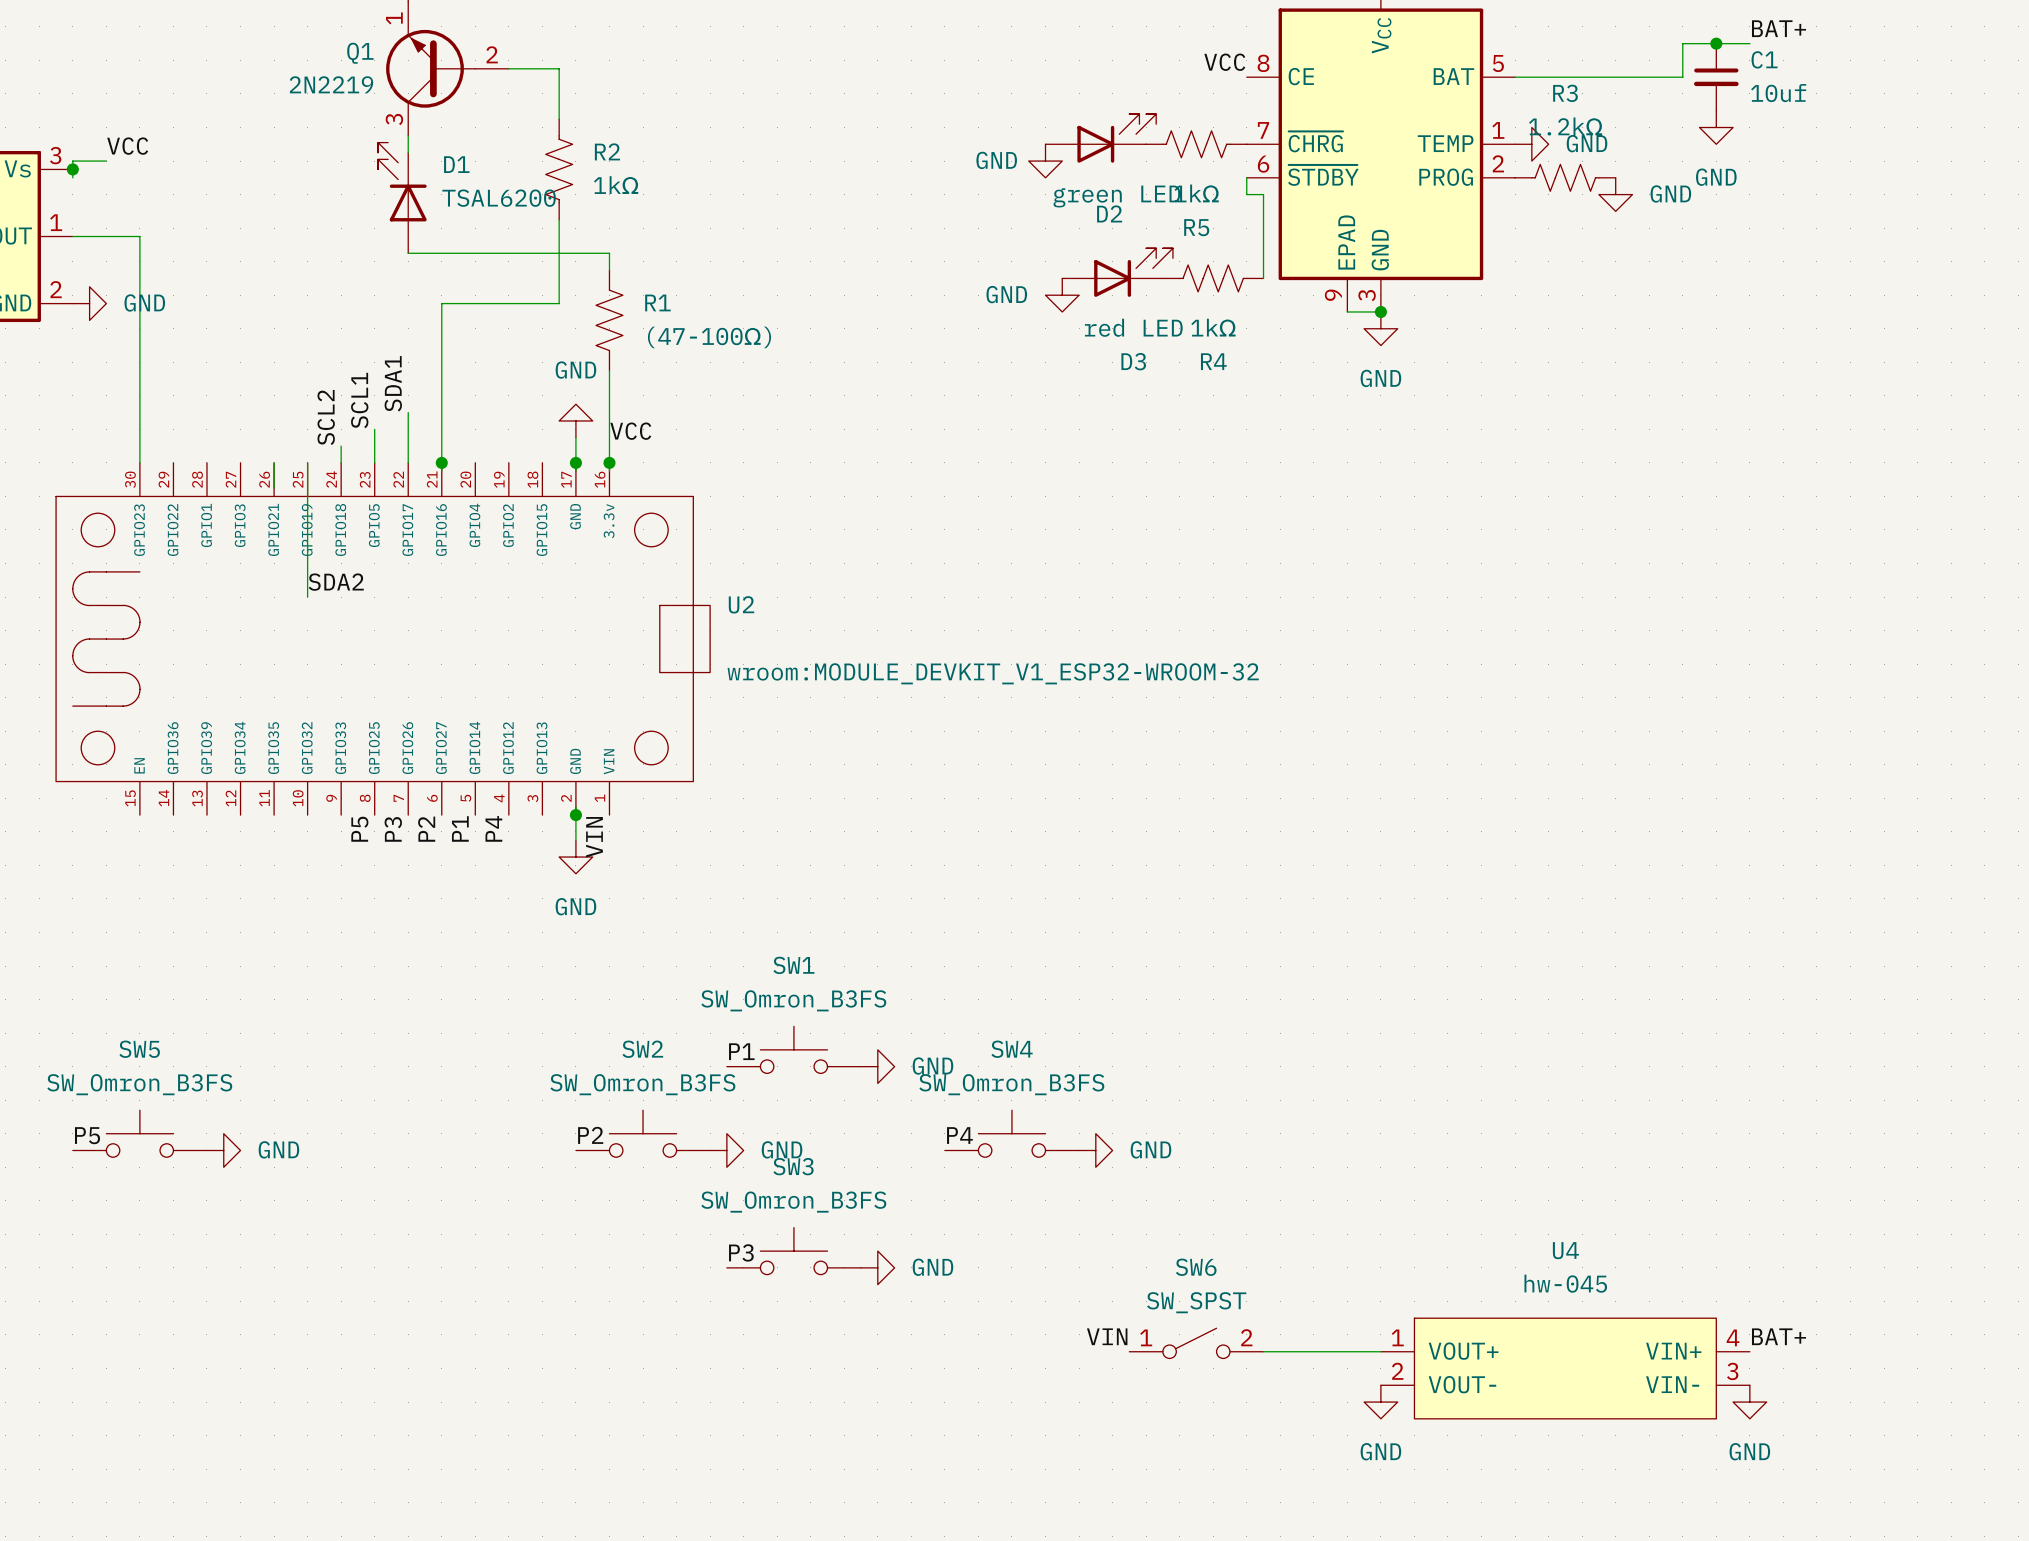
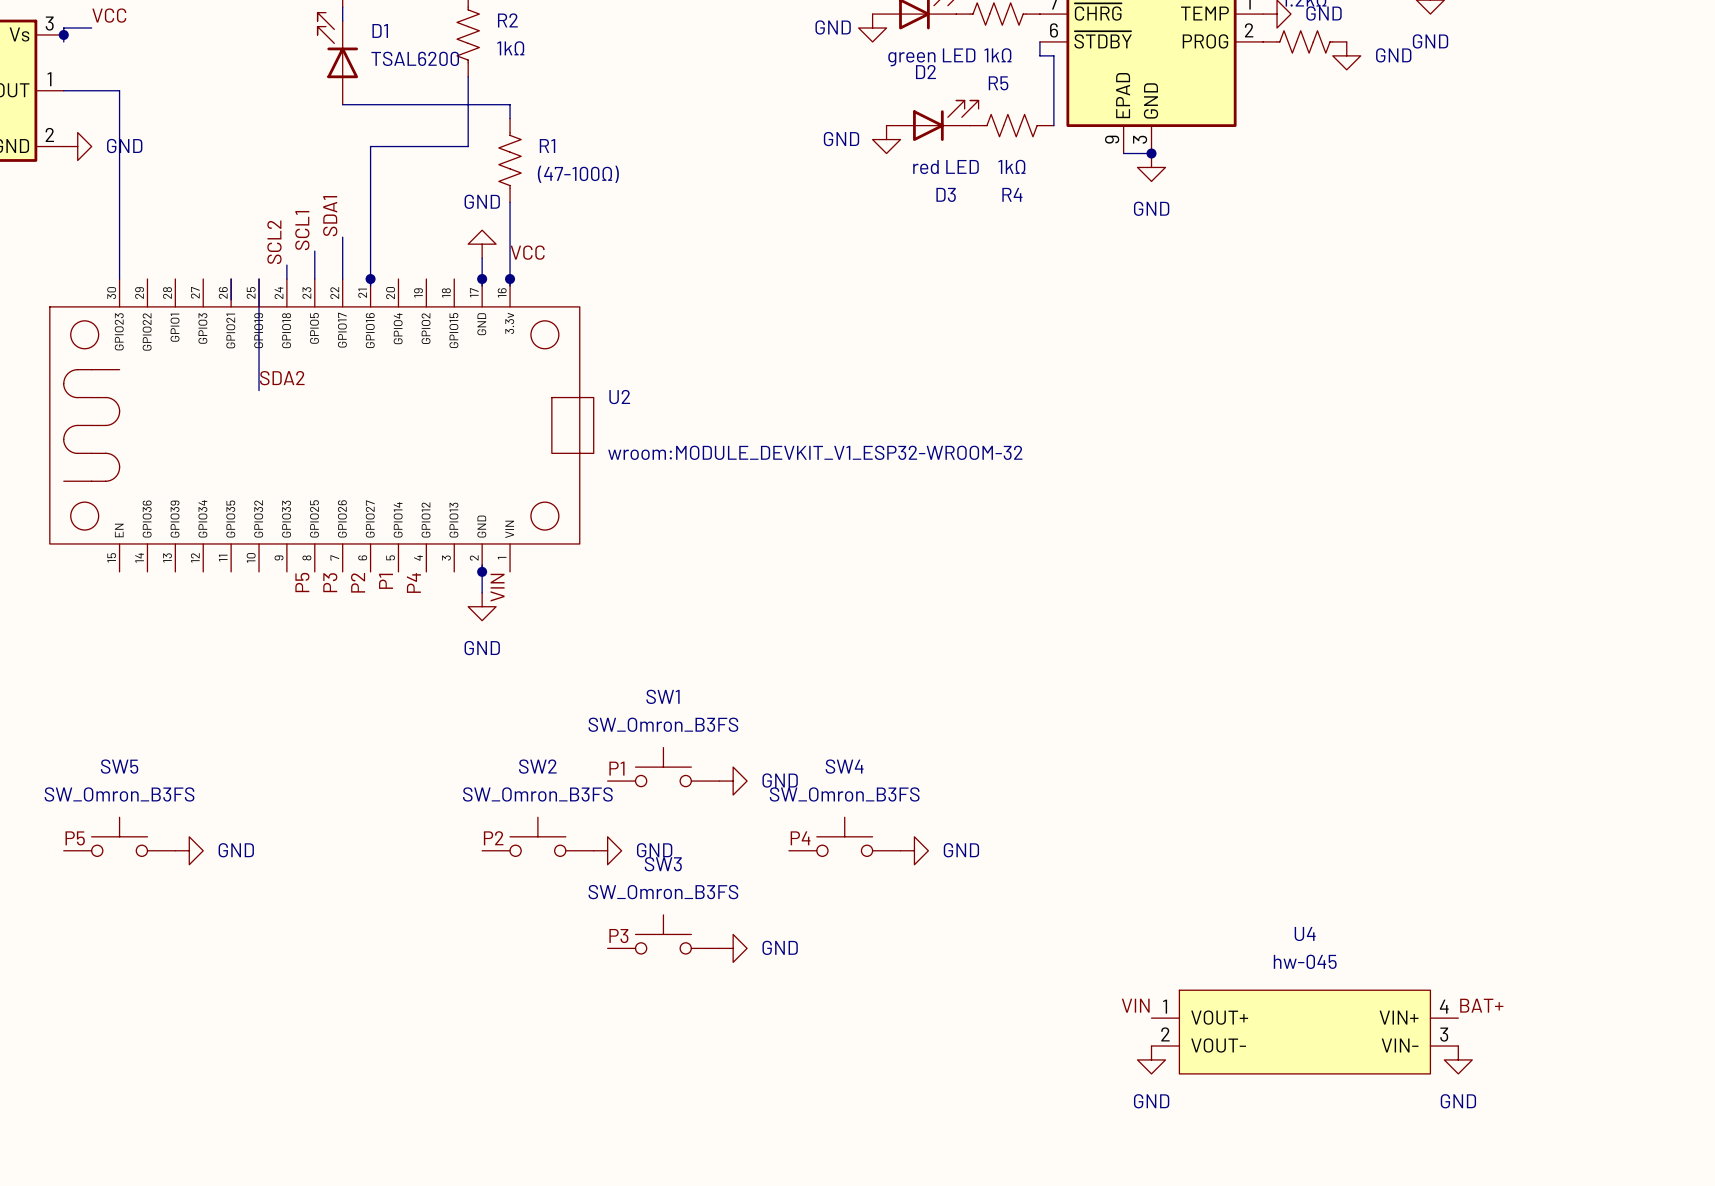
label position: VIN (1107, 1336) -> VIN (1135, 1005)
SW6: SW_SPST (1196, 1343) -> none
wire: (1263, 1351) (1380, 1351) -> none

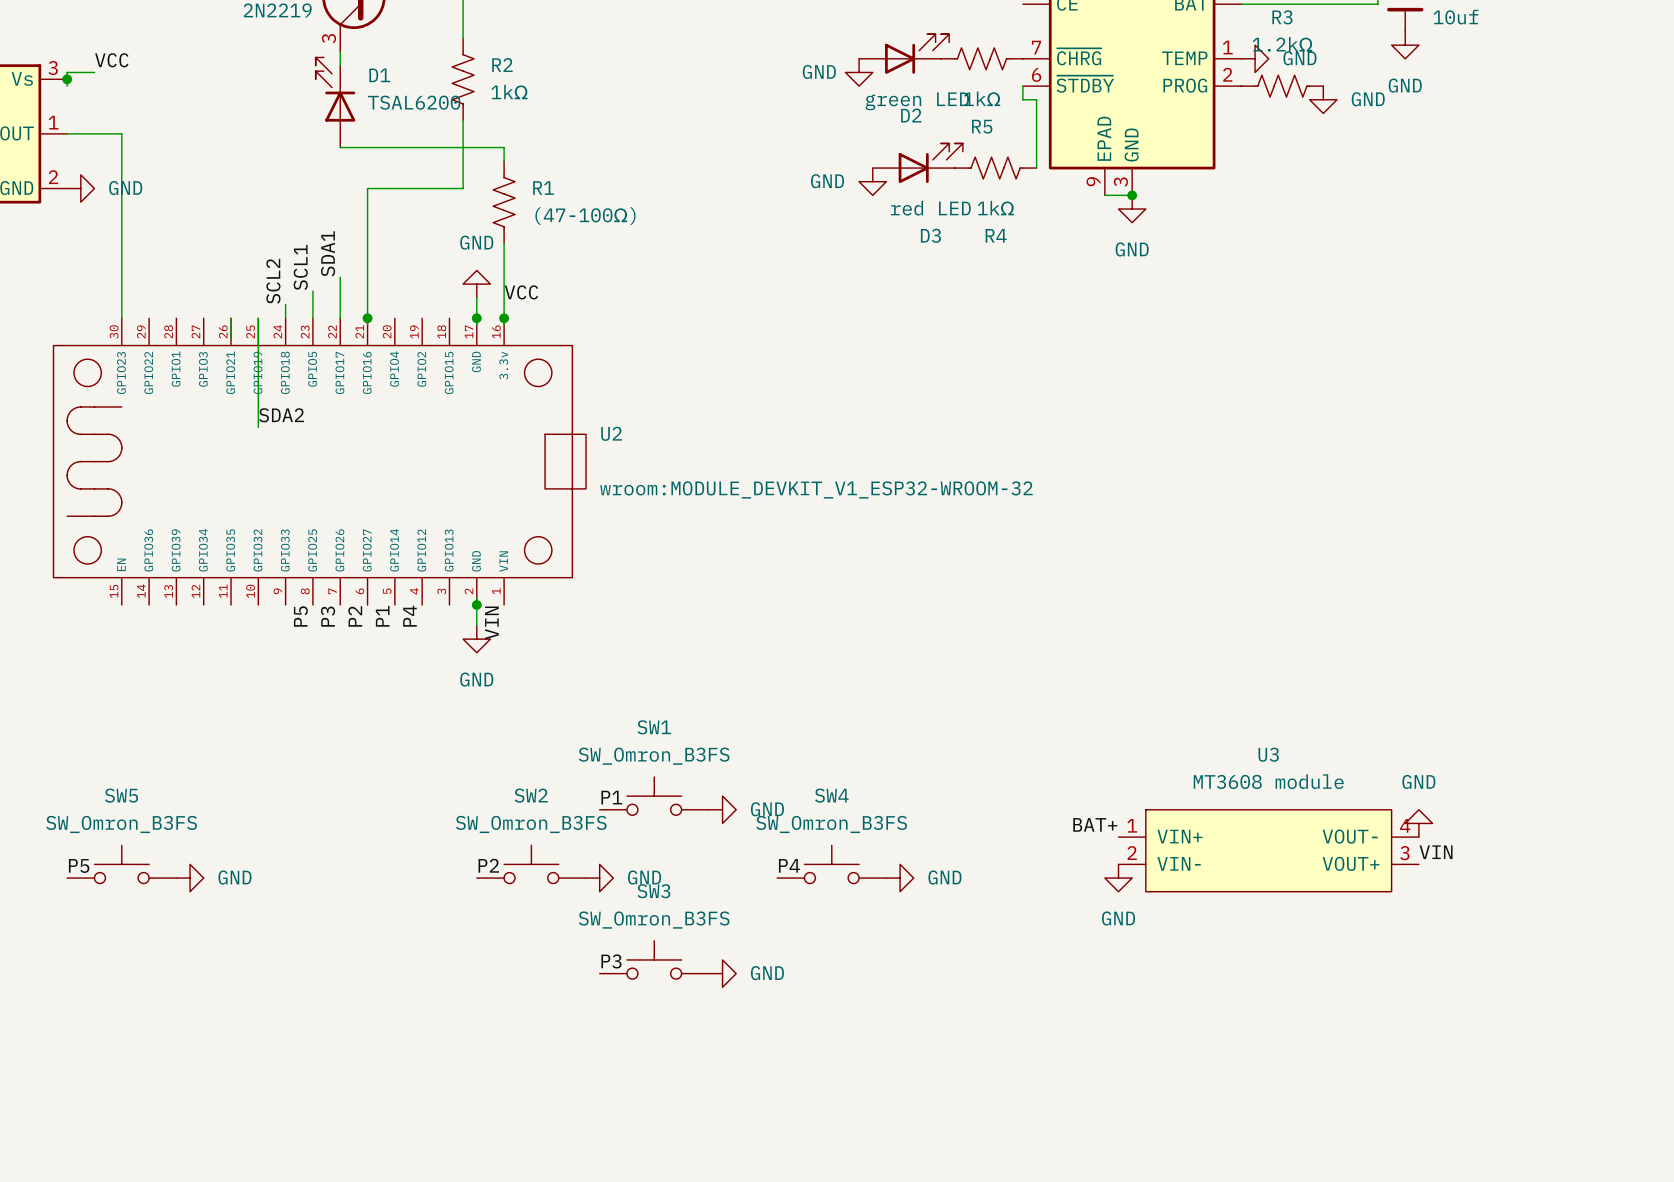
power symbol: none -> GND (1418, 823)
label: none -> BAT+ (1095, 824)
U3: none -> MT3608 module (1268, 850)
label: none -> VIN (1436, 852)
power symbol: none -> GND (1118, 878)
label: VIN (1135, 1005) -> none
label: BAT+ (1481, 1005) -> none
U4: hw-045 (1304, 1032) -> none
power symbol: GND (1151, 1059) -> none
power symbol: GND (1458, 1059) -> none

